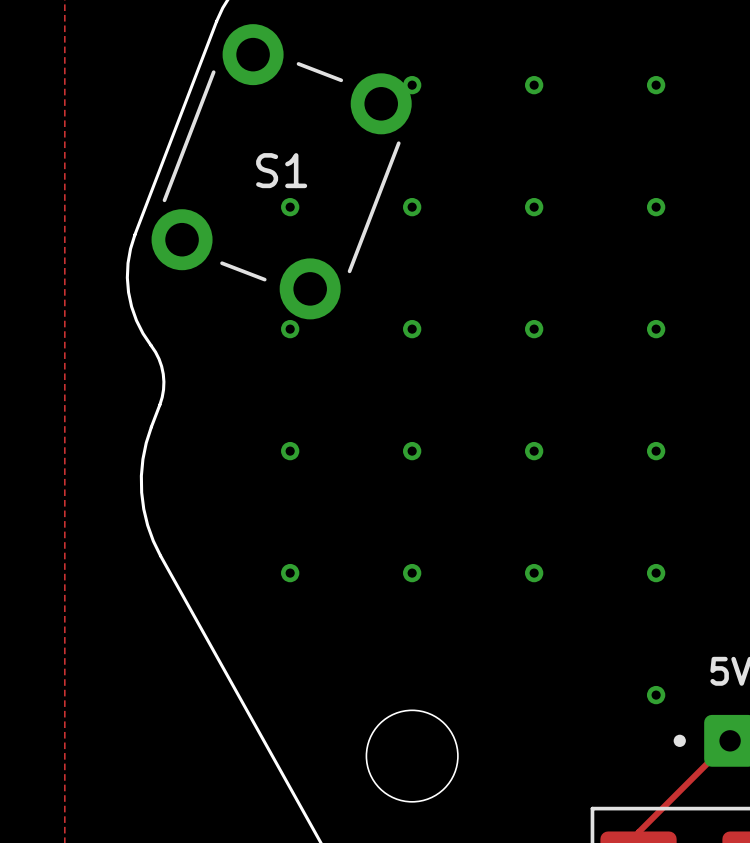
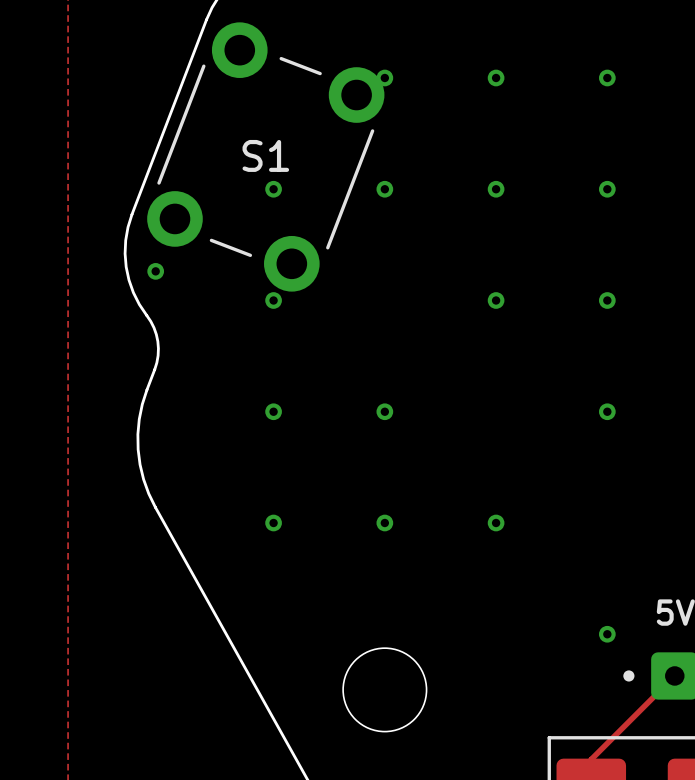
via: none -> (155, 271)
via: (412, 329) -> none
via: (534, 451) -> none
via: (656, 573) -> none

